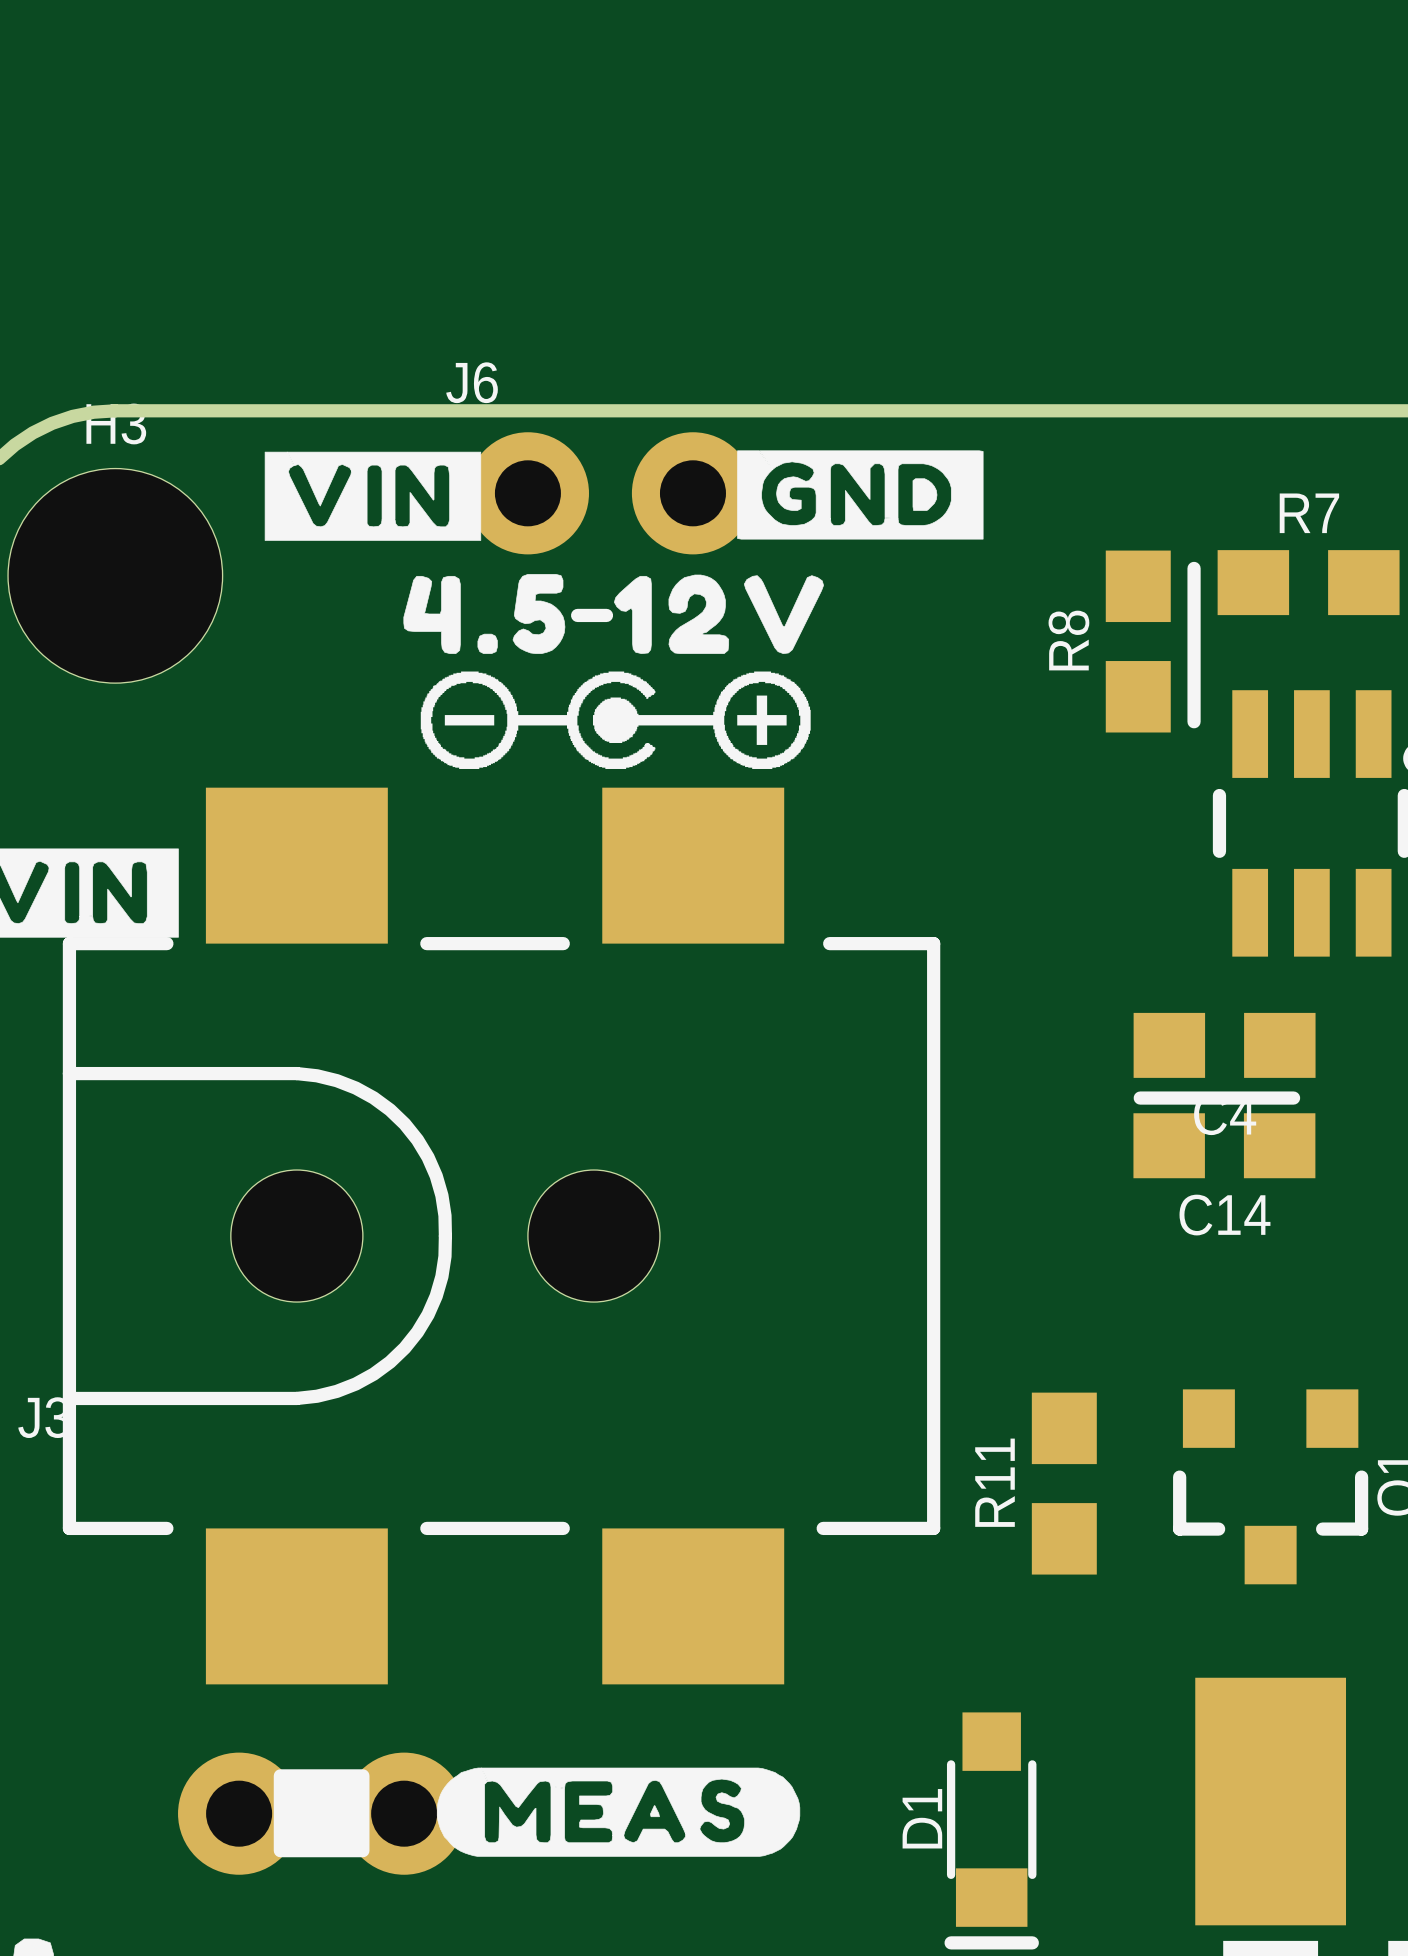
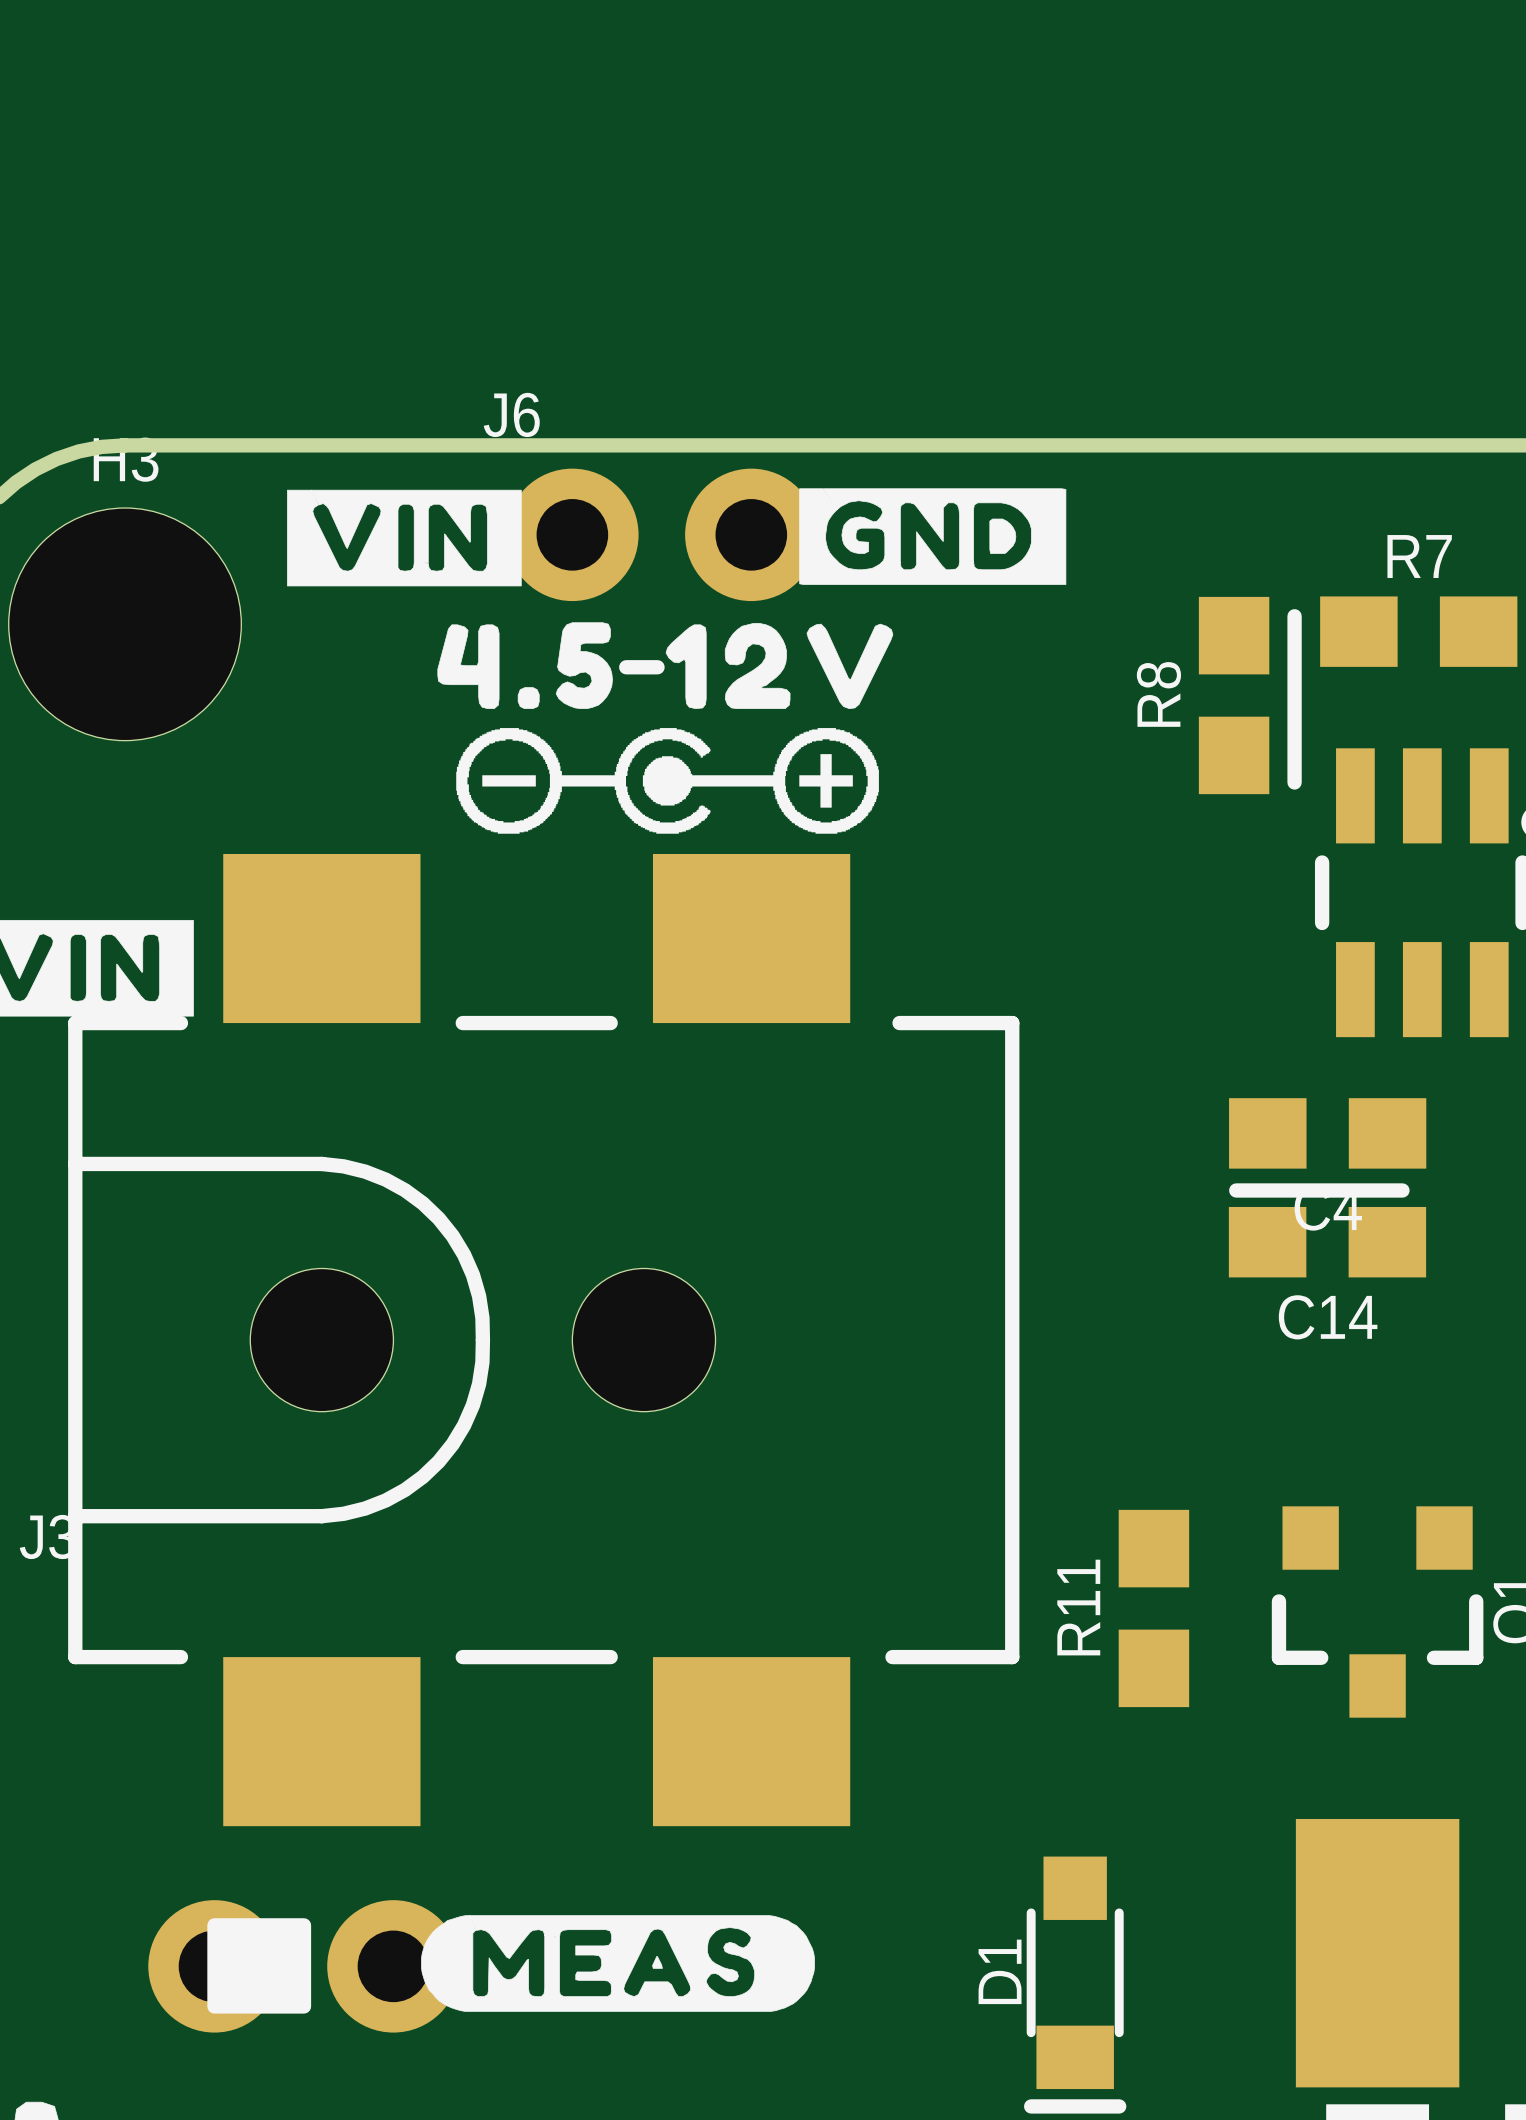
drawing position: (618, 1812) -> (618, 1963)
drawing position: (321, 1813) -> (259, 1965)
part position: (321, 1813) -> (303, 1966)

